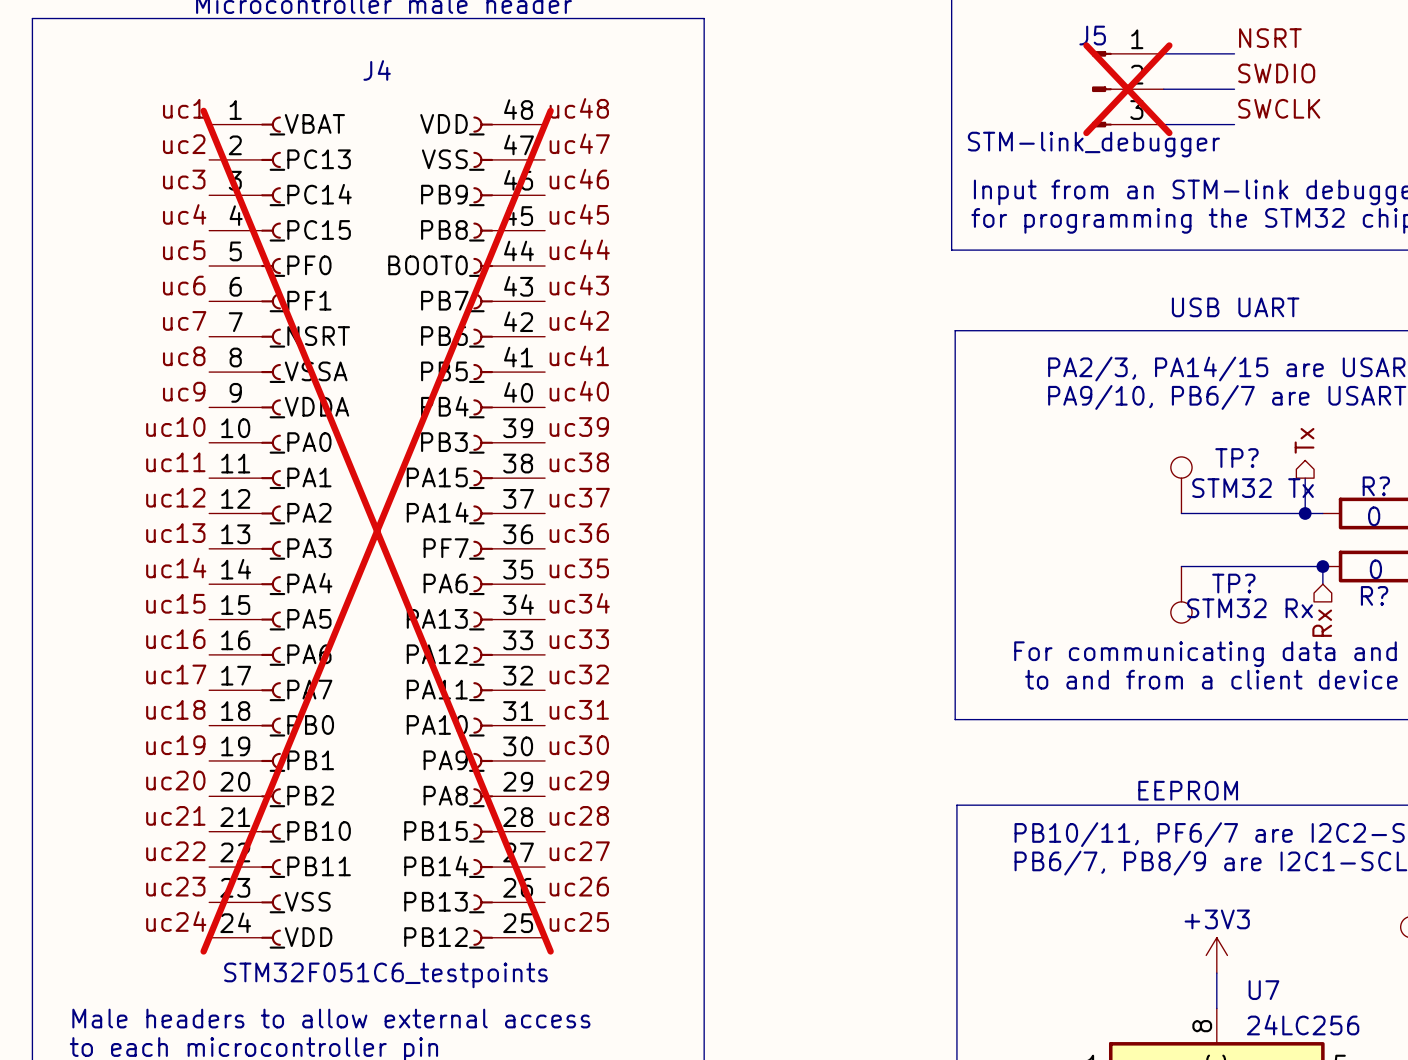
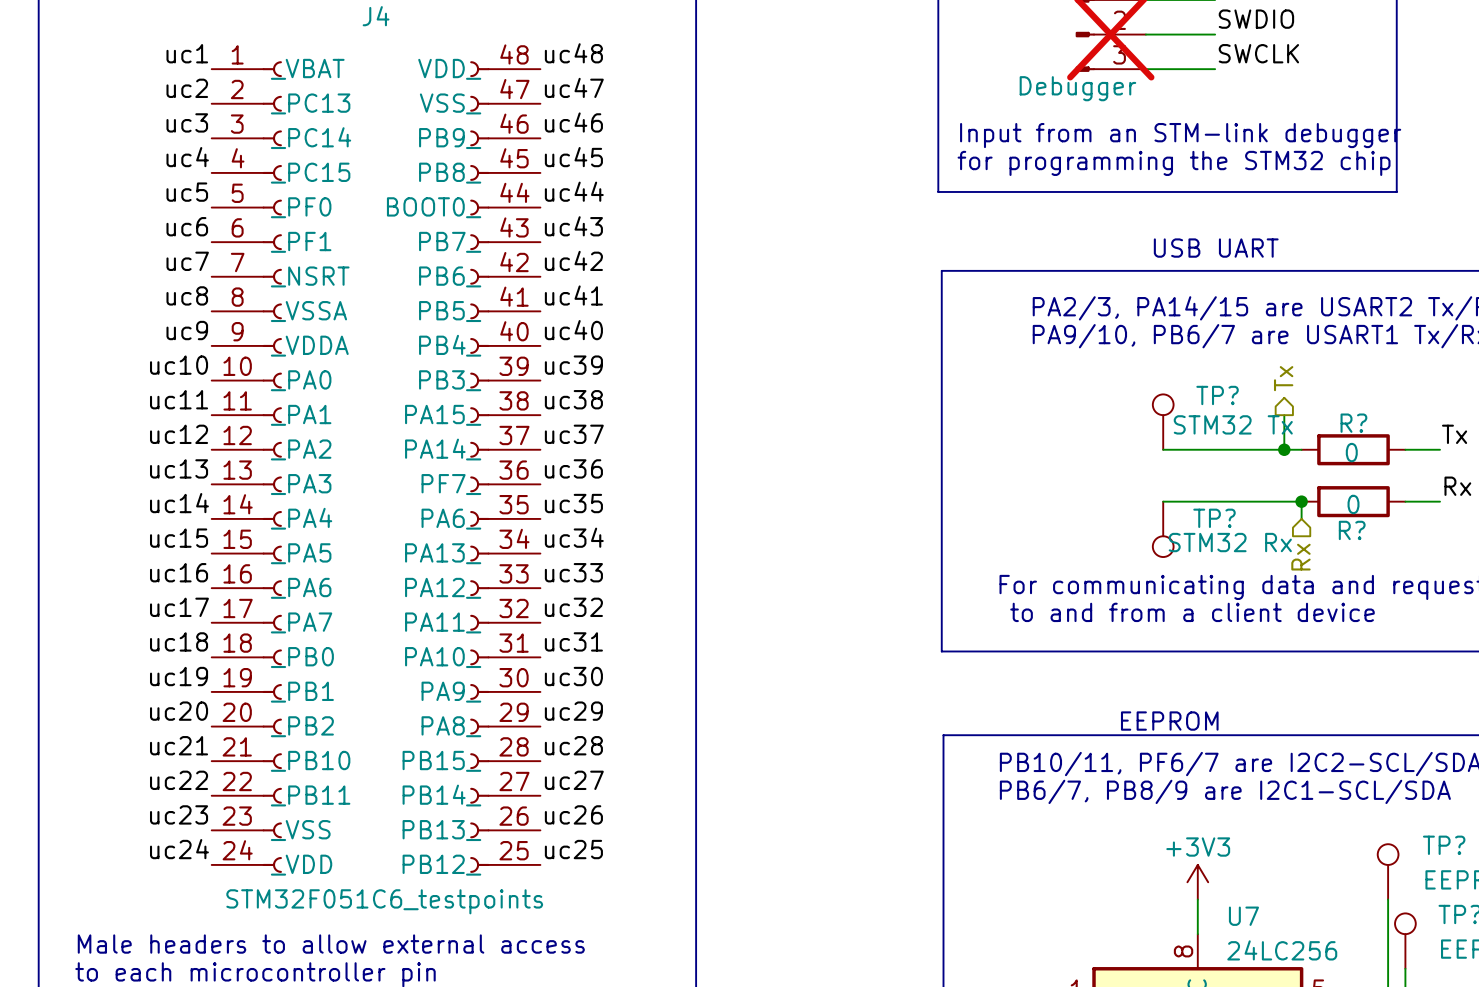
J5 value: STM-link_debugger (1093, 144) -> Debugger (1077, 88)
J4 do-not-place cross: (377, 531) -> none

